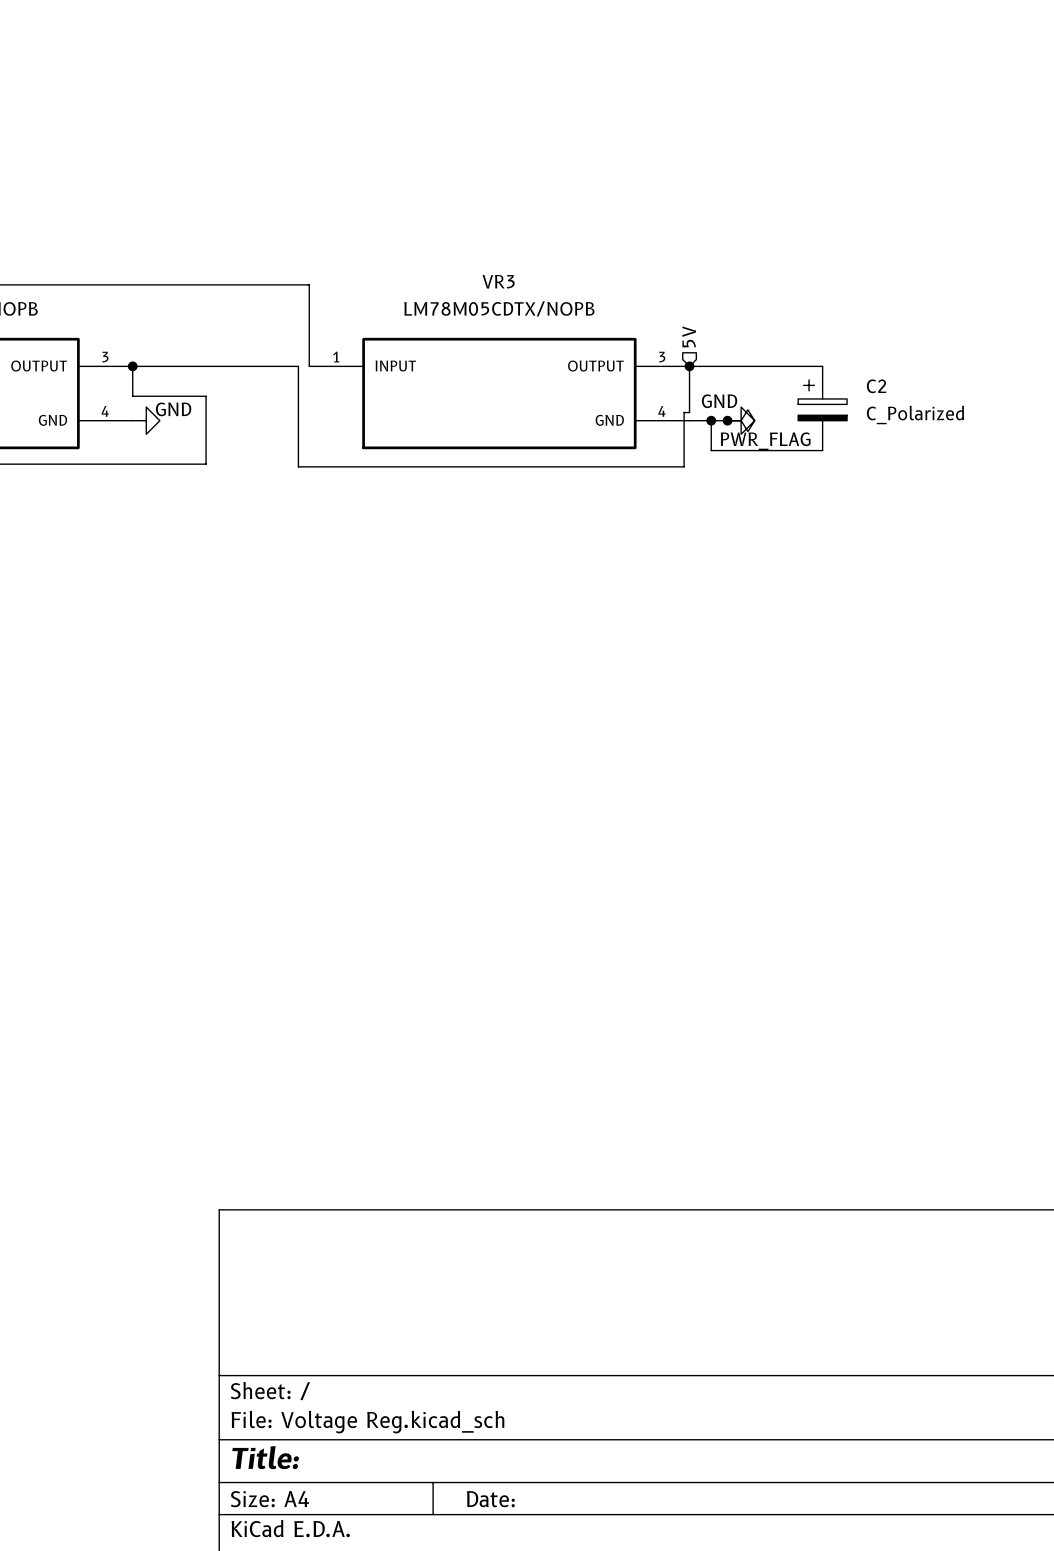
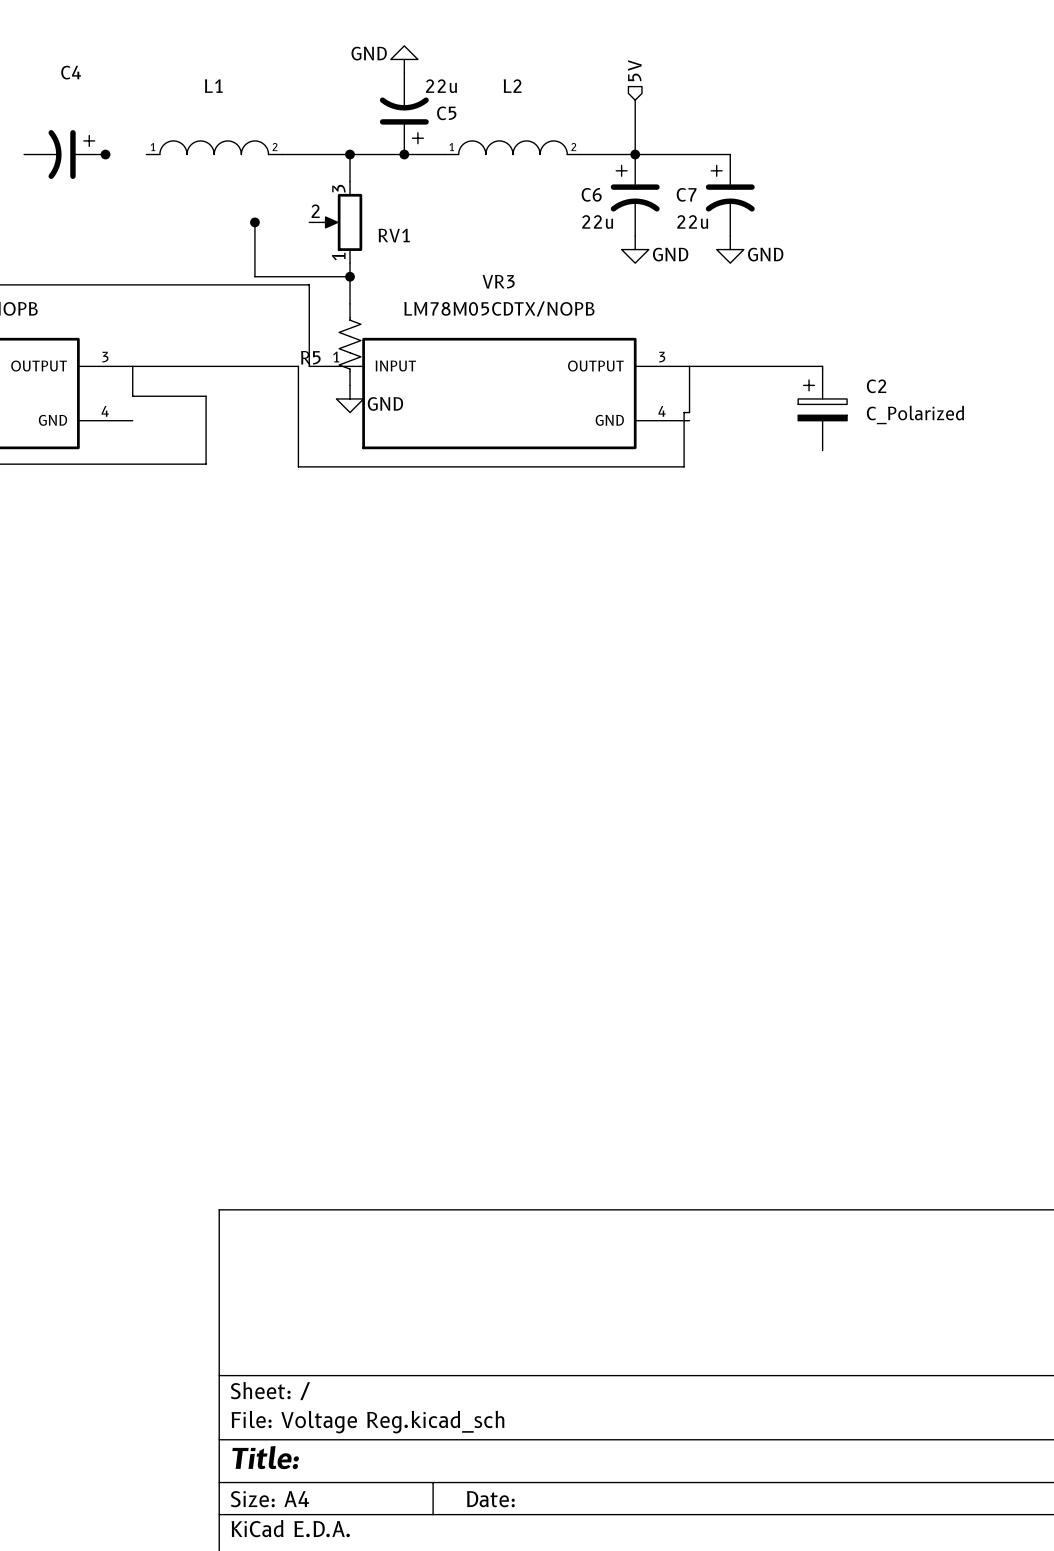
power symbol: none -> GND (404, 59)
hierarchical label: none -> 5V (634, 70)
wire: none -> (635, 100) (635, 154)
C5: none -> 22u (404, 113)
L1: none -> (214, 147)
L2: none -> (512, 147)
C4: none -> (64, 154)
junction: none -> (105, 154)
wire: none -> (282, 154) (445, 154)
wire: none -> (350, 154) (350, 181)
junction: none -> (350, 154)
junction: none -> (404, 154)
wire: none -> (580, 154) (730, 154)
junction: none -> (635, 154)
C6: none -> 22u (635, 195)
C7: none -> 22u (730, 195)
wire: none -> (254, 222) (254, 276) (350, 276)
junction: none -> (254, 222)
RV1: none -> (335, 222)
power symbol: none -> GND (635, 249)
power symbol: none -> GND (730, 249)
wire: none -> (350, 263) (350, 303)
junction: none -> (350, 276)
hierarchical label: 5V (689, 336) -> none
R5: none -> (350, 344)
junction: (132, 366) -> none
junction: (689, 366) -> none
power symbol: none -> GND (350, 398)
power symbol: GND (146, 420) -> none
wire: (689, 420) (727, 420) -> none
wire: (711, 420) (711, 450) (822, 450) -> none
junction: (711, 420) -> none
junction: (727, 420) -> none
power symbol: GND (741, 420) -> none
power symbol: PWR_FLAG (741, 420) -> none

